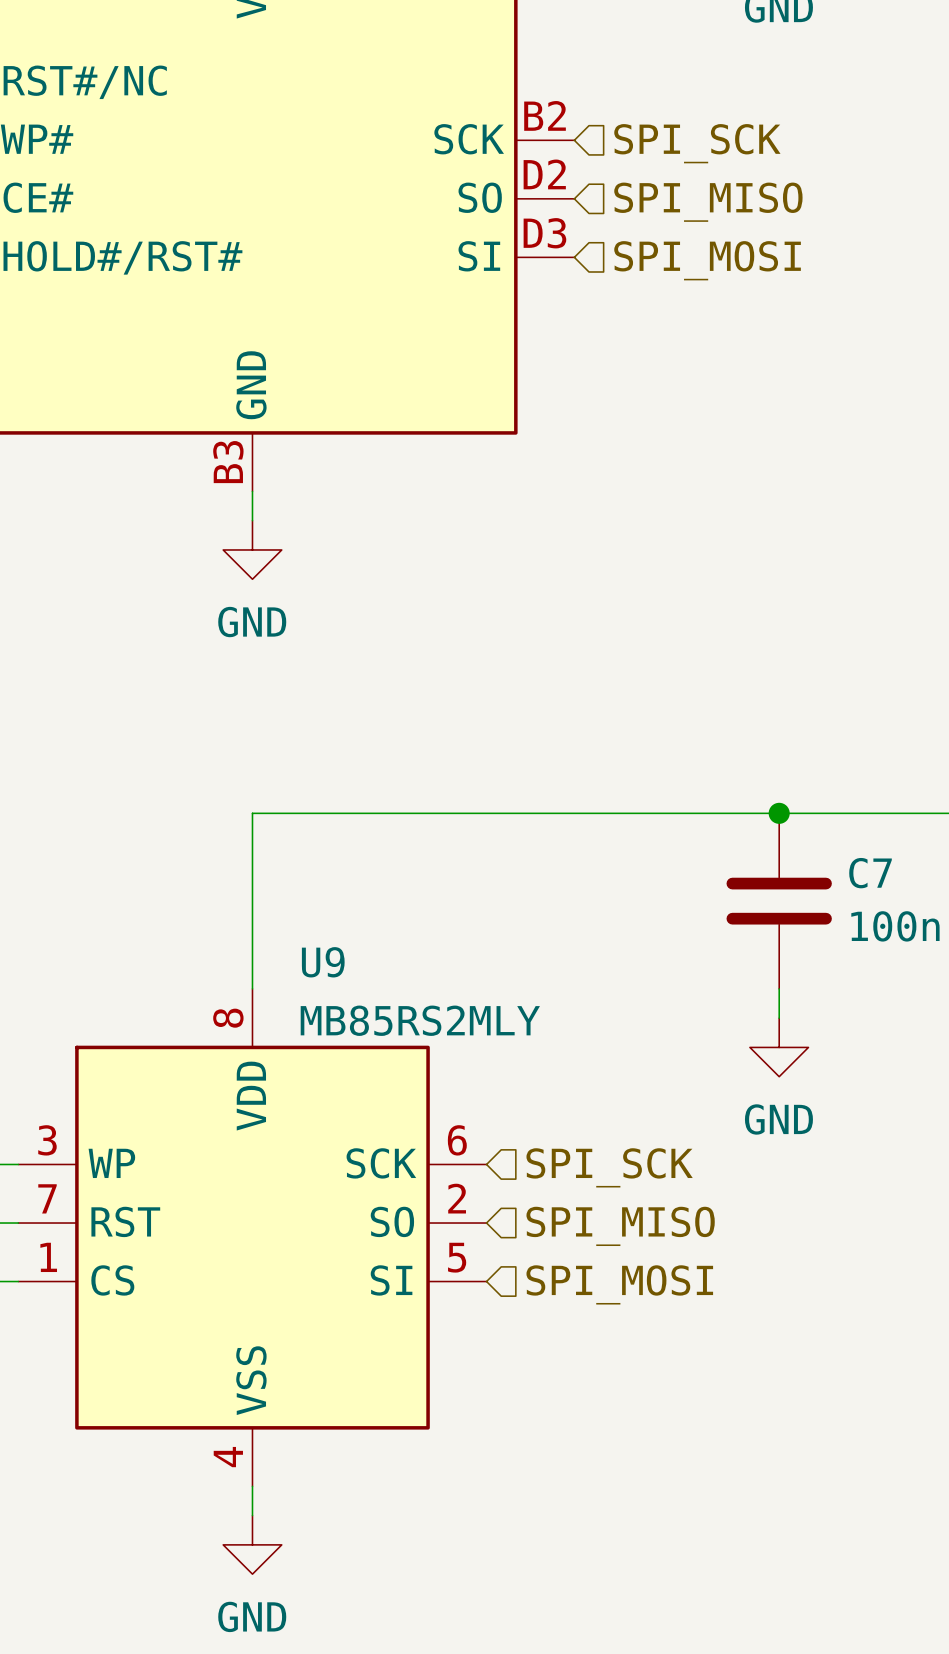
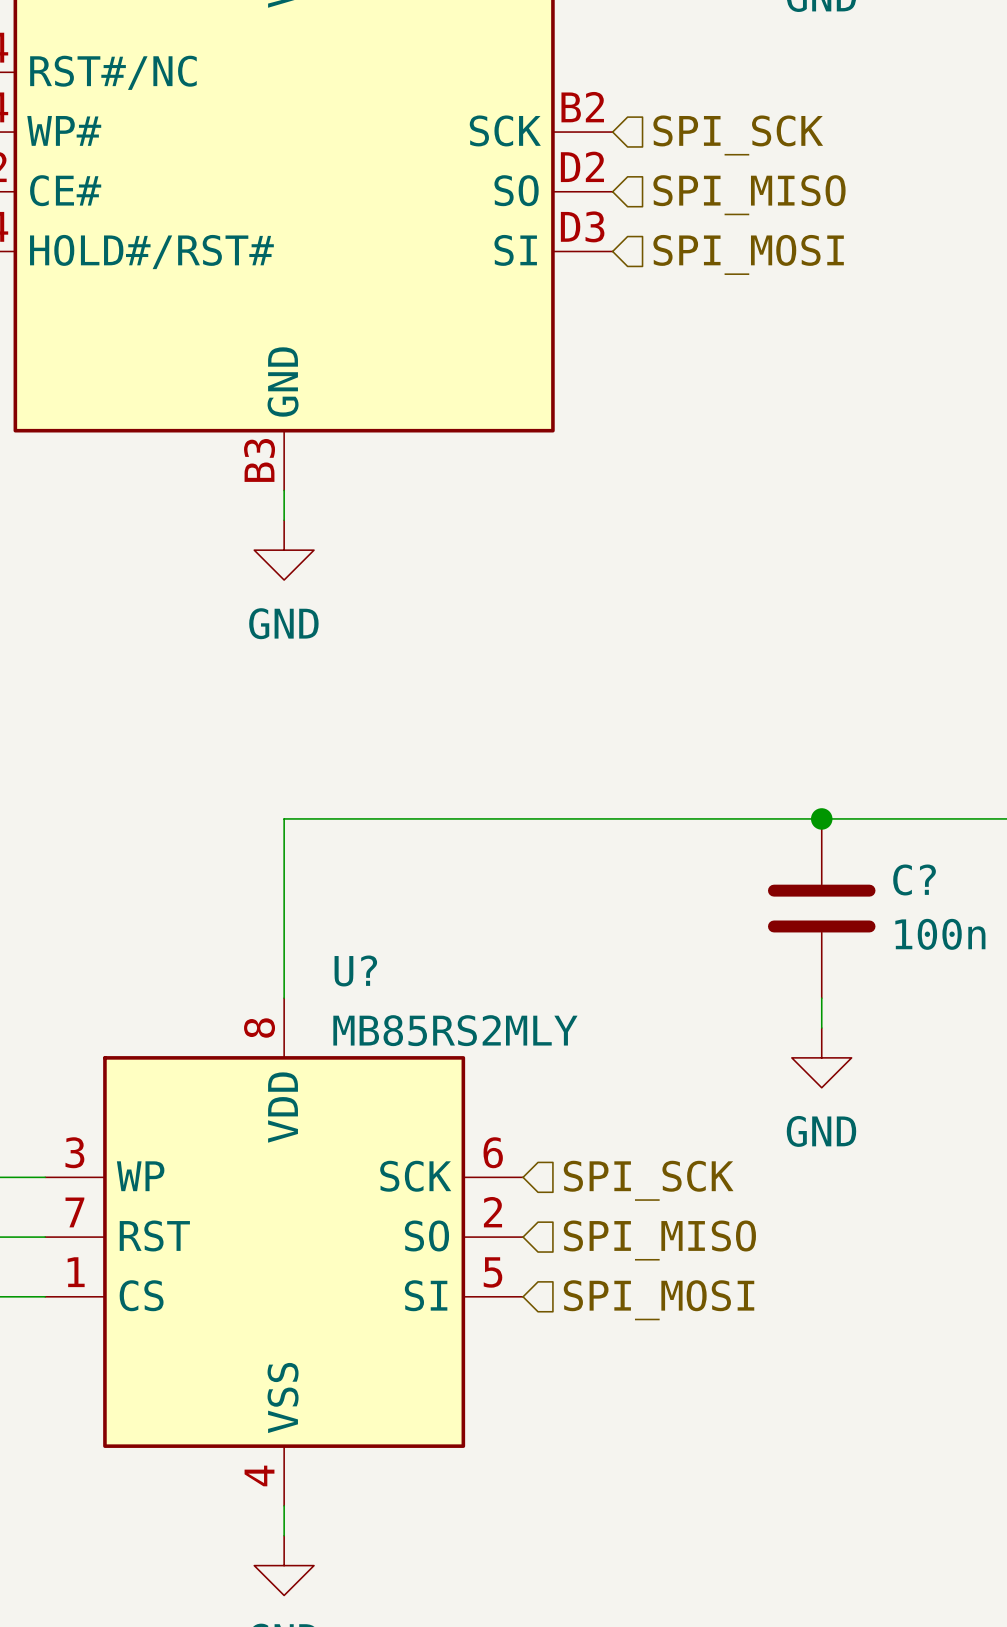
C7 name: C7 (870, 873) -> C? (914, 879)
U9 name: U9 (323, 962) -> U? (355, 970)

